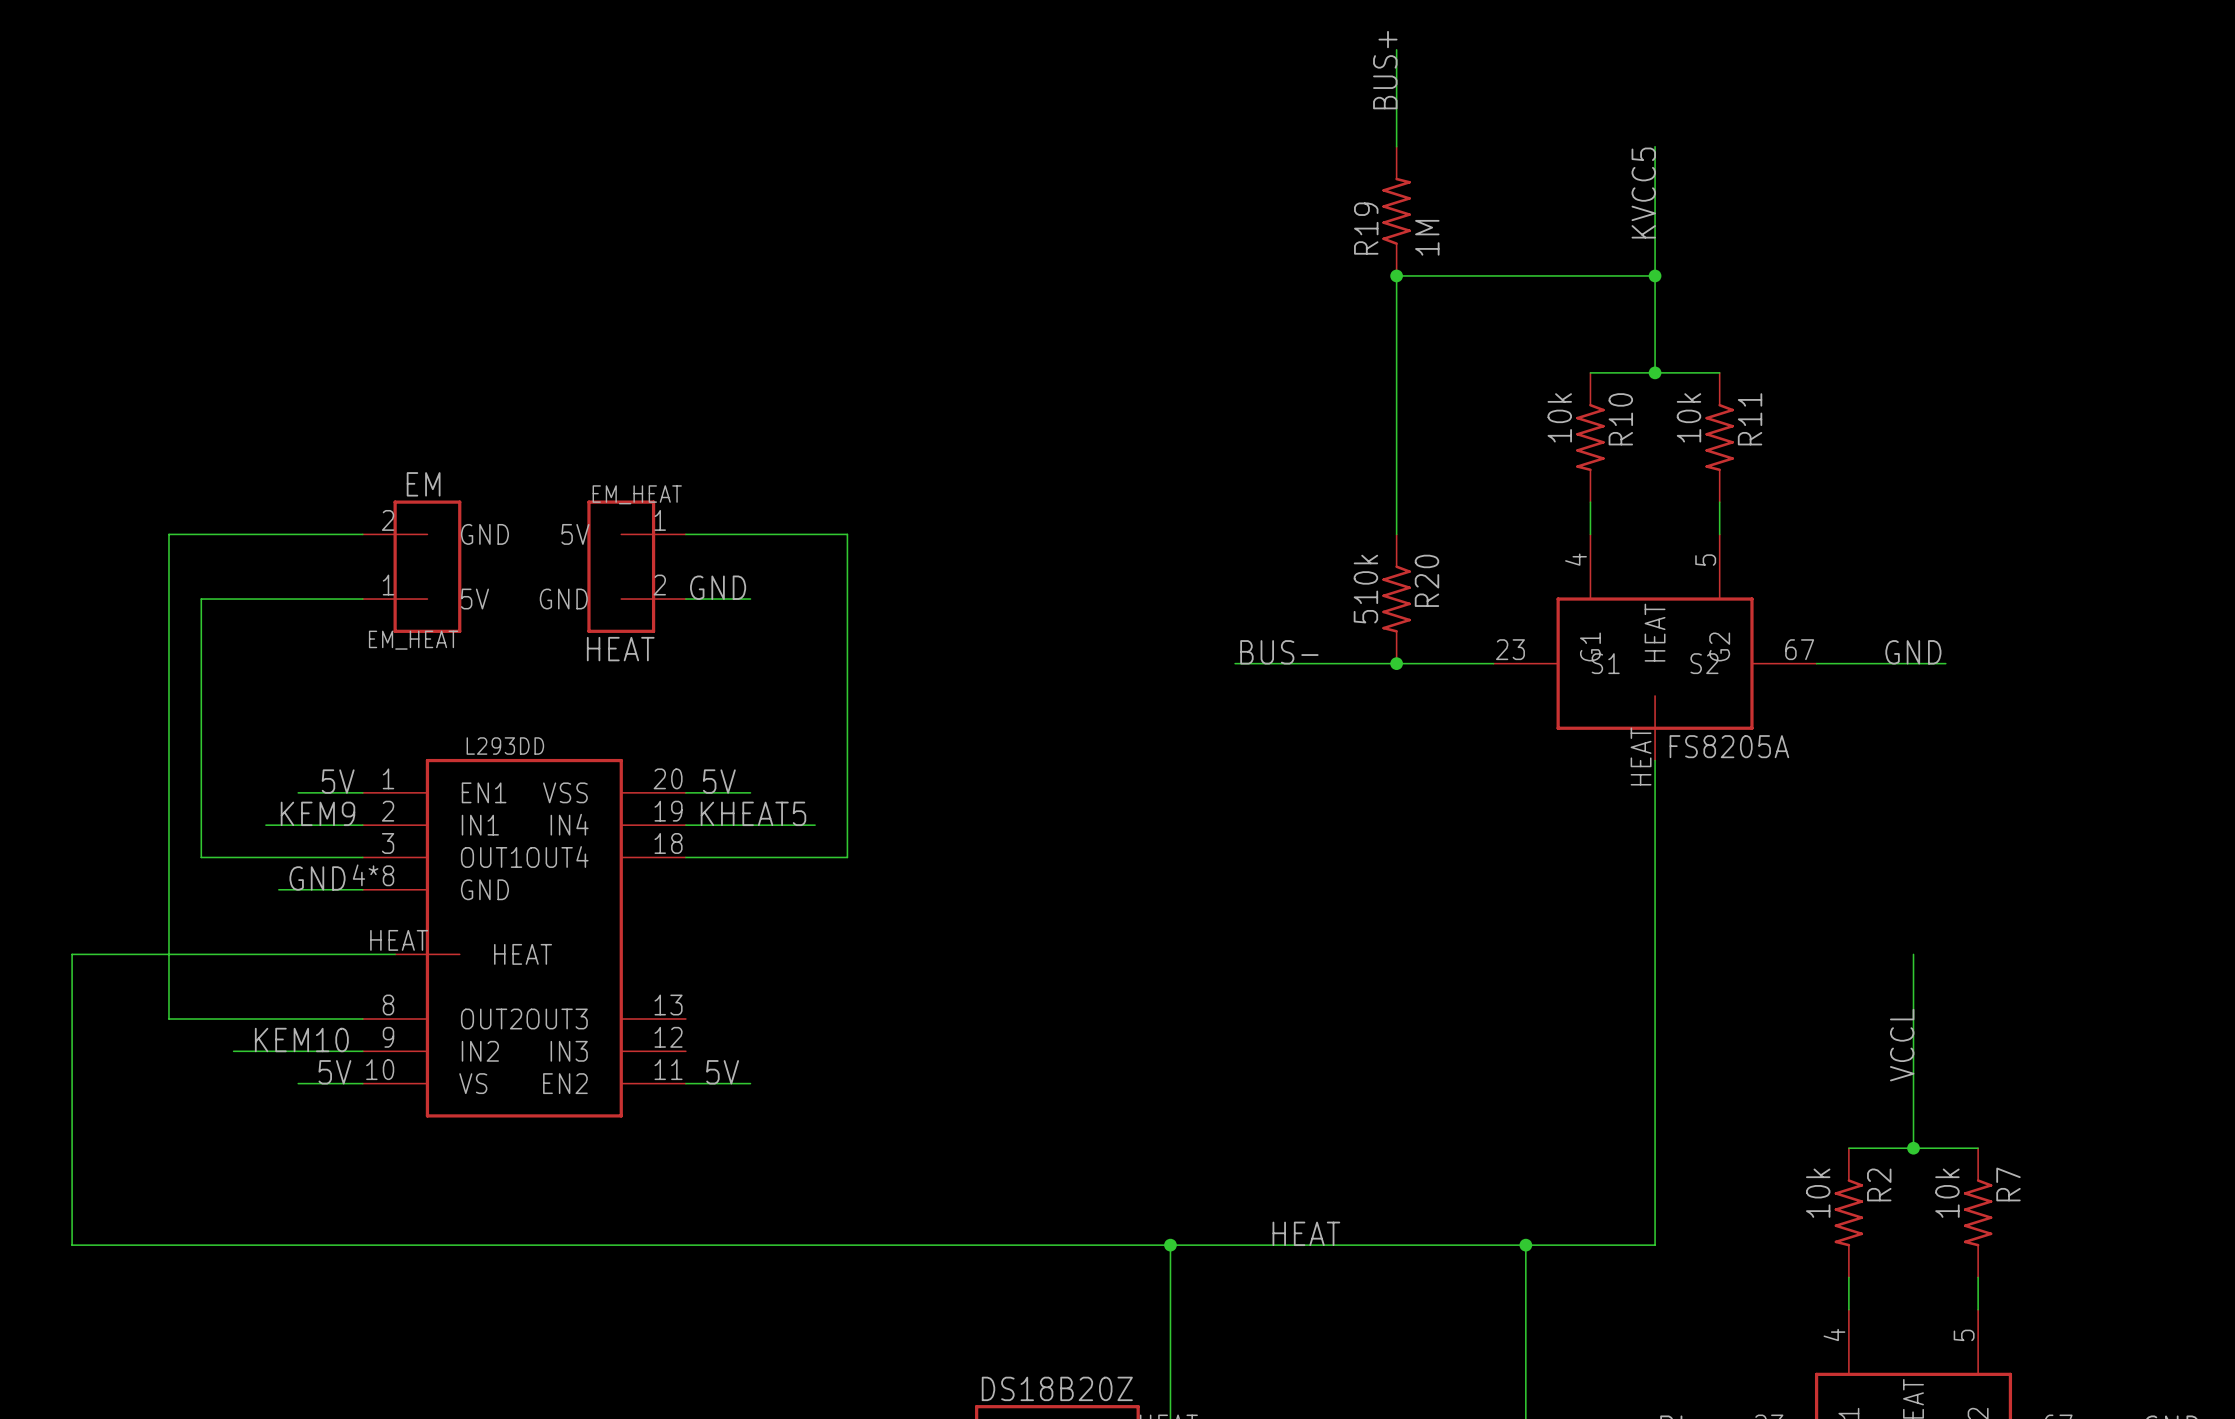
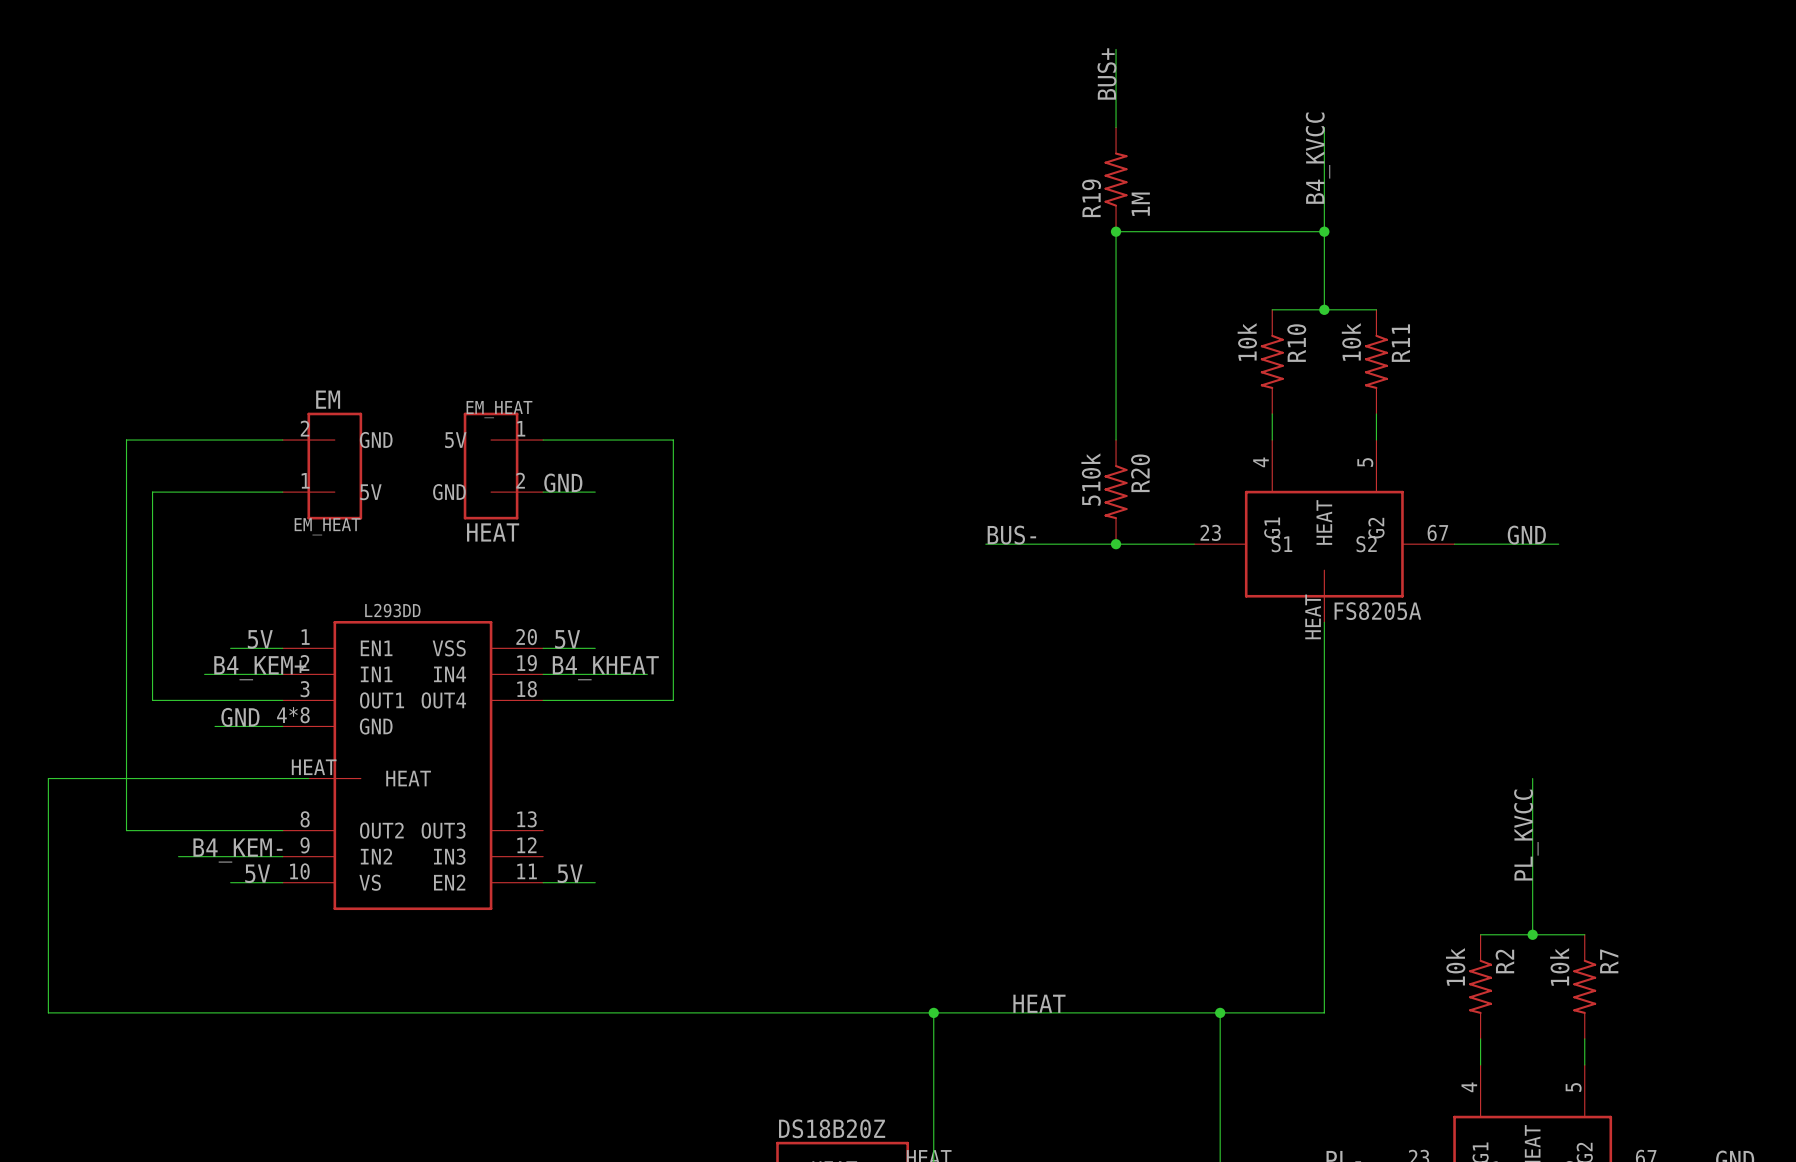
label: KVCC5 (1643, 193) -> B4_KVCC (1318, 158)
label: KEM9 (317, 813) -> B4_KEM+ (260, 668)
label: KHEAT5 (753, 813) -> B4_KHEAT (605, 668)
label: KEM10 (301, 1040) -> B4_KEM- (237, 850)
label: VCCL (1902, 1045) -> PL_KVCC (1526, 835)

